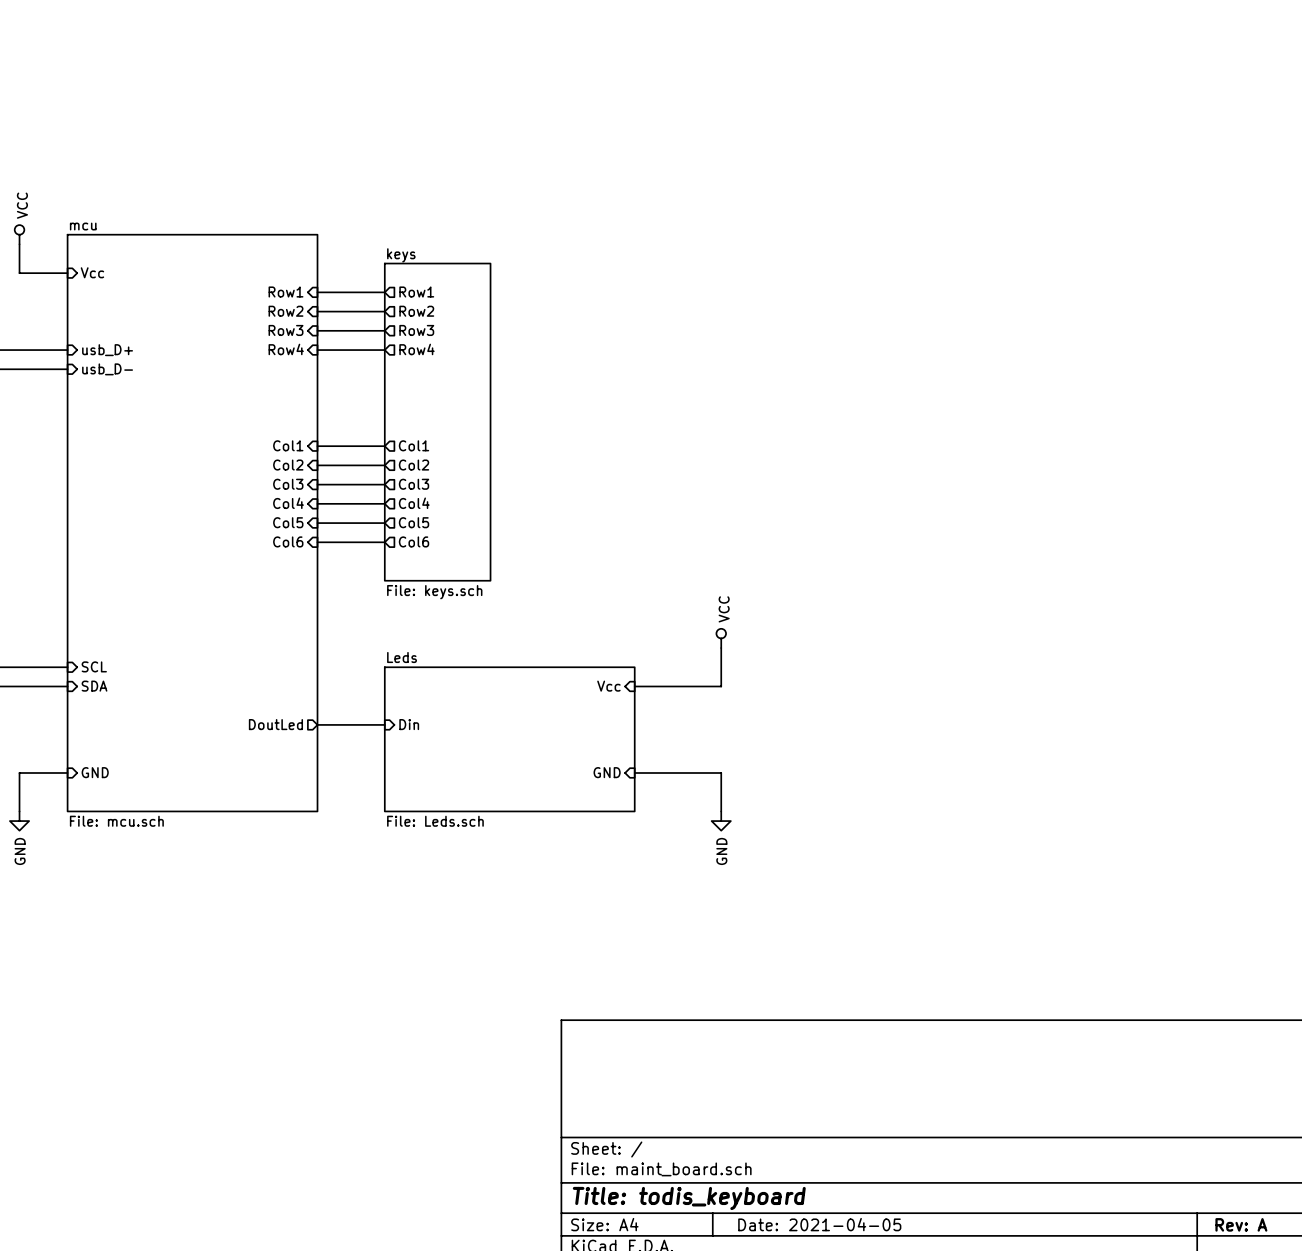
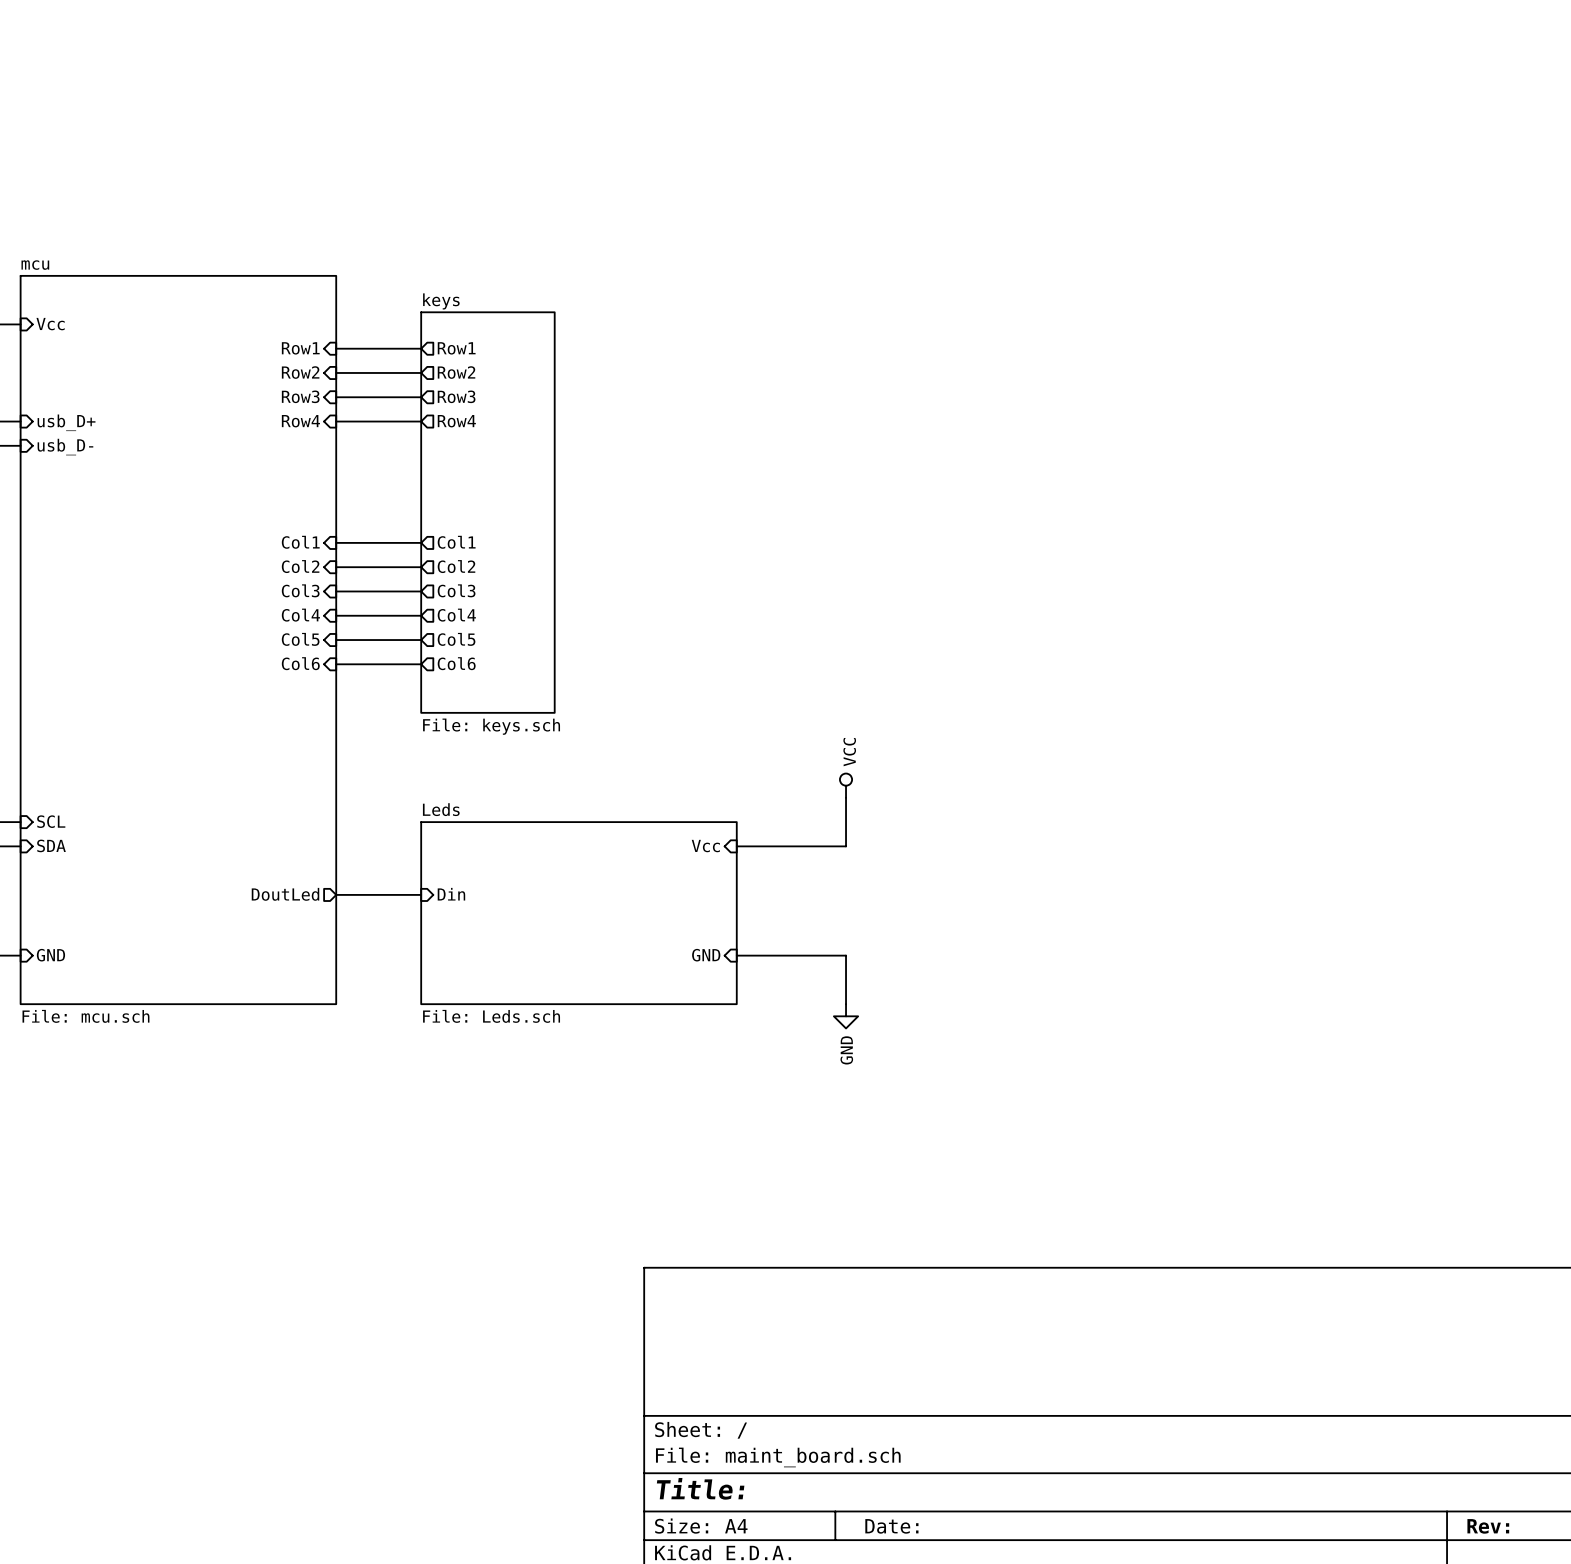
title block: Title: todis_keyboard (689, 1198) -> Title: (700, 1488)
title block: Date: 2021-04-05 (819, 1224) -> Date: (891, 1526)
title block: Rev: A (1241, 1224) -> Rev: (1488, 1526)

